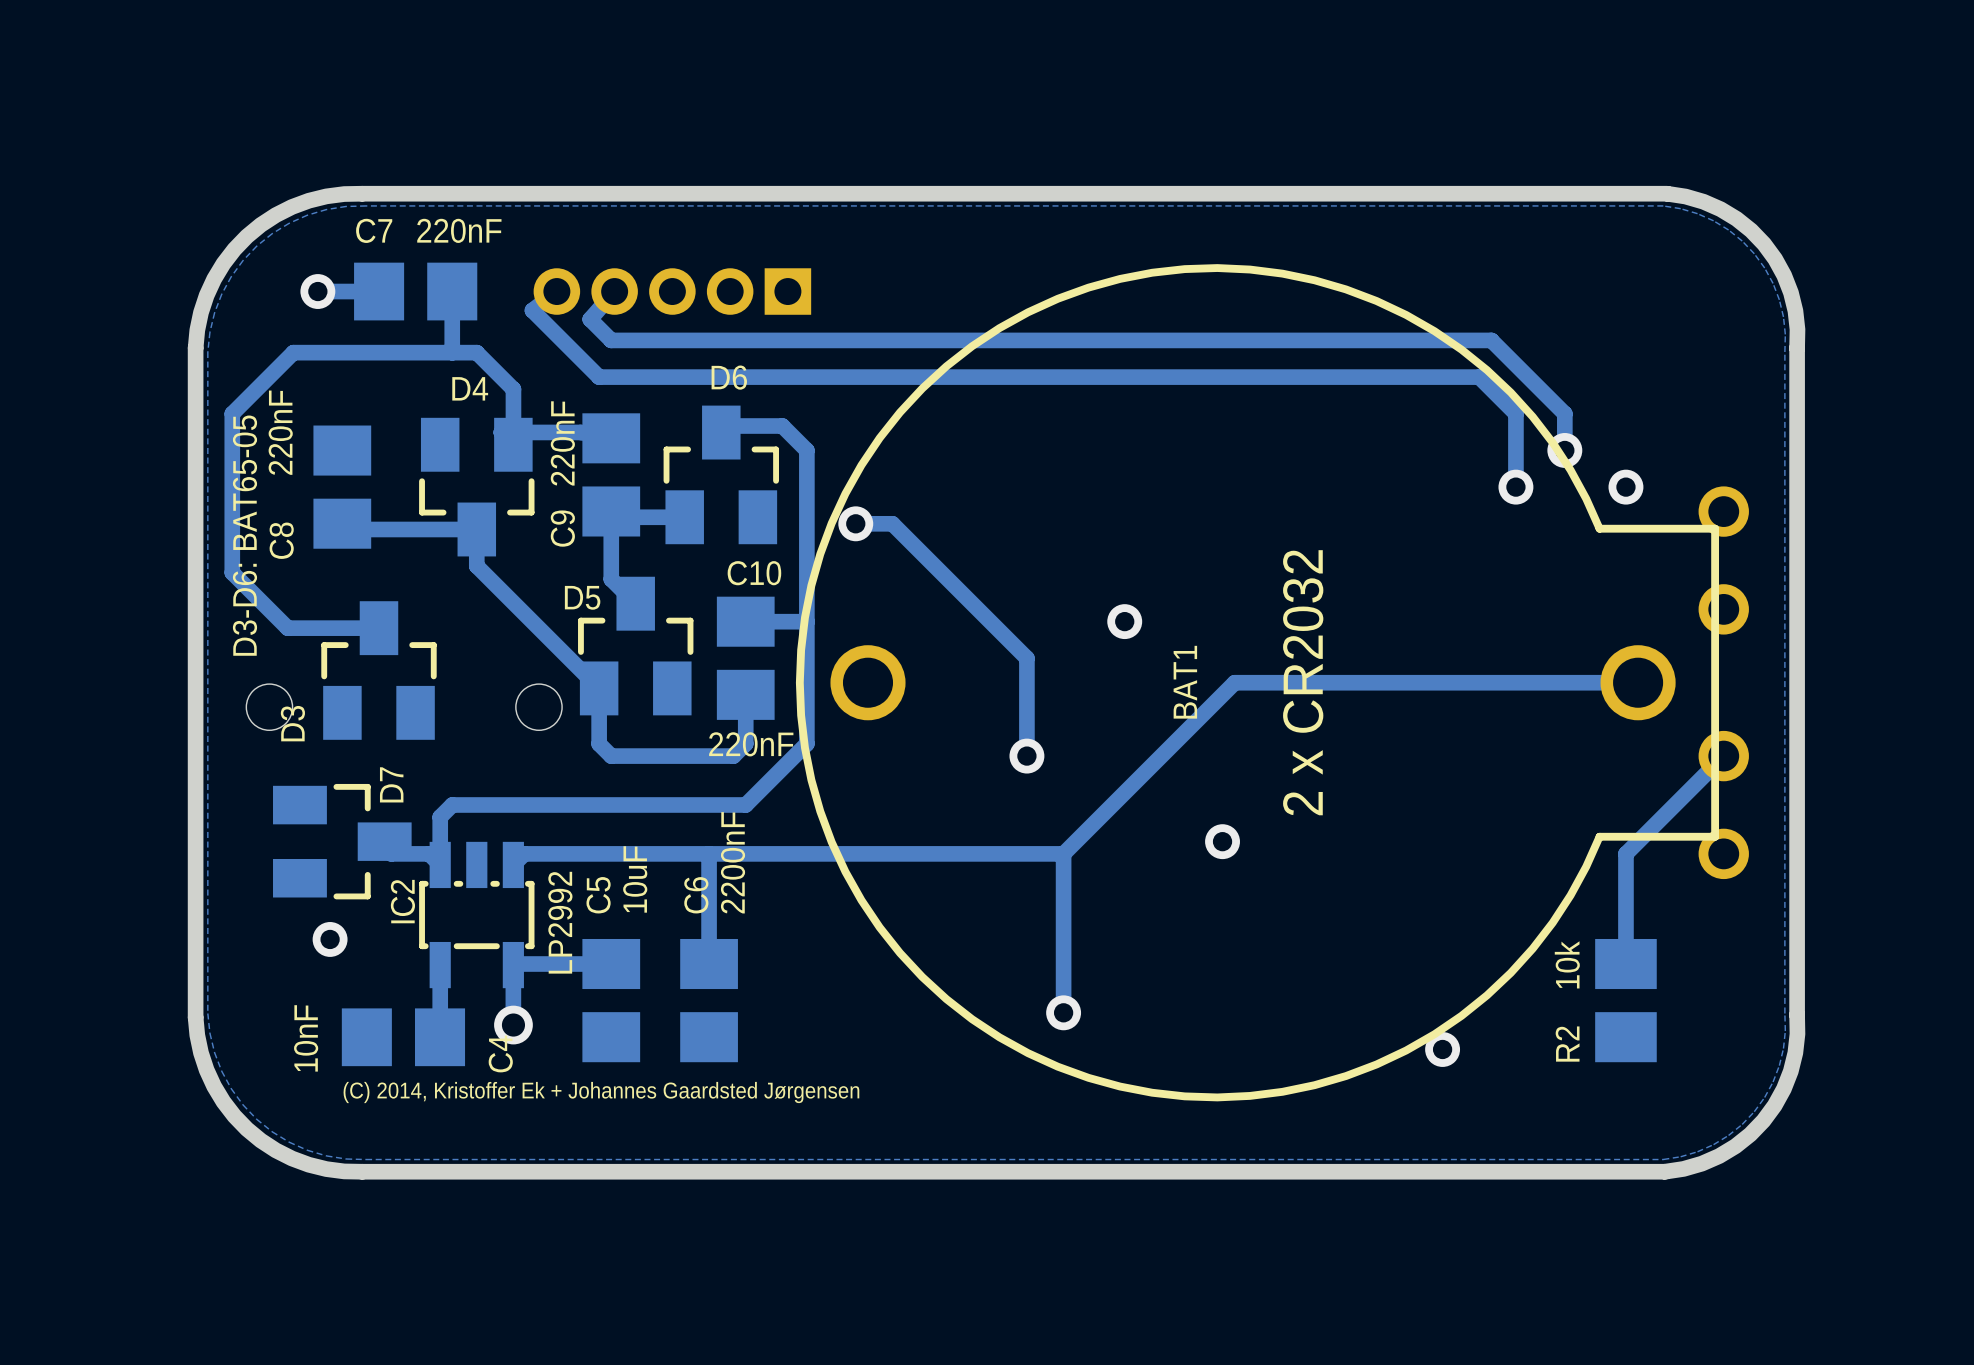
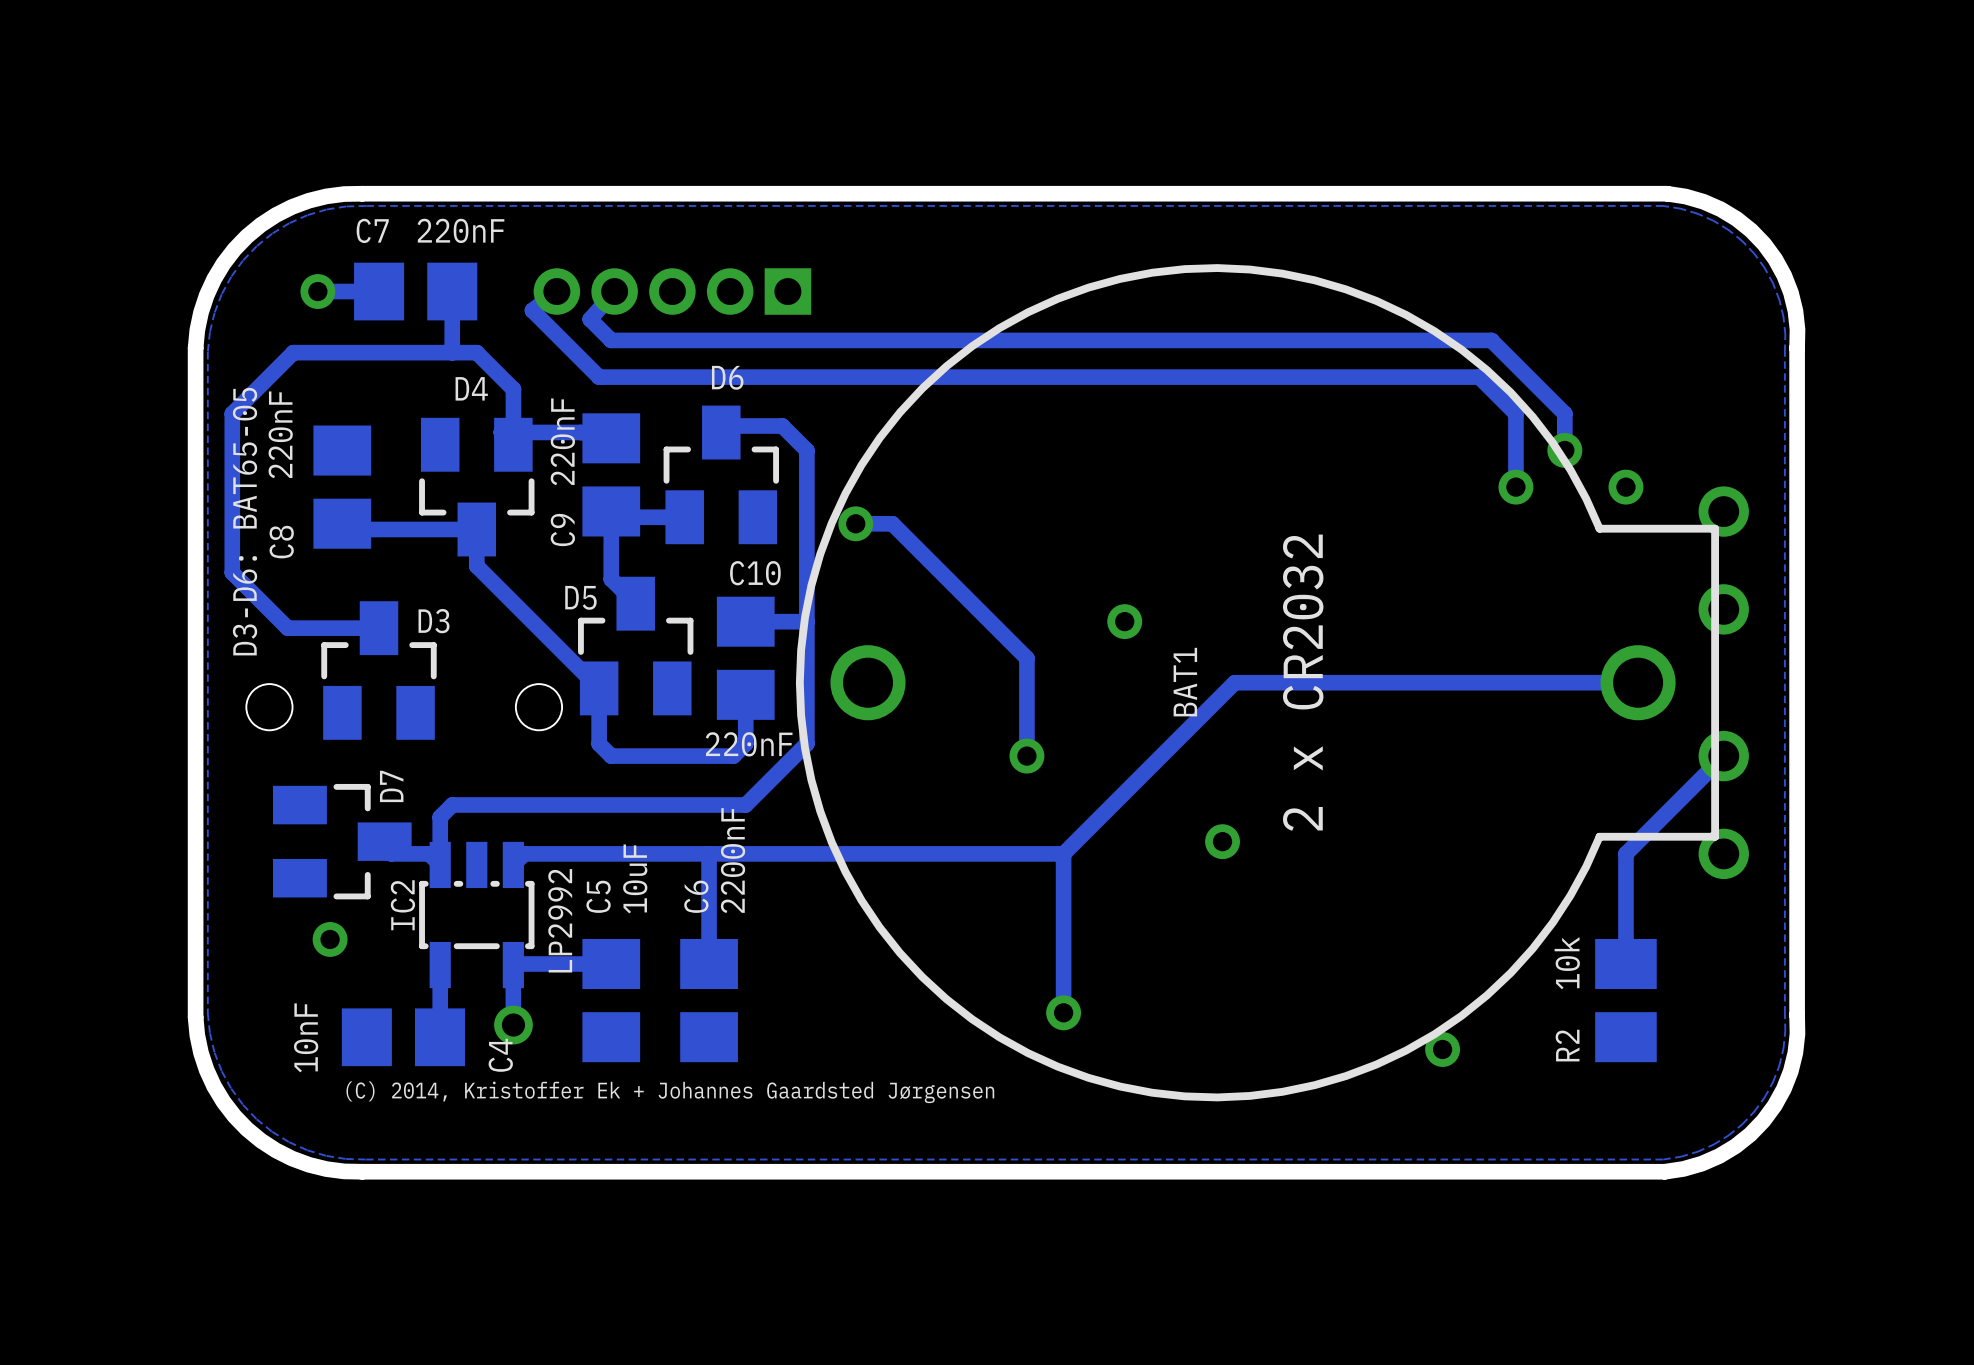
D3 name rotation: 0° (292, 723) -> 90° clockwise (434, 621)
D3 name position: D3 (292, 723) -> D3 (434, 621)

